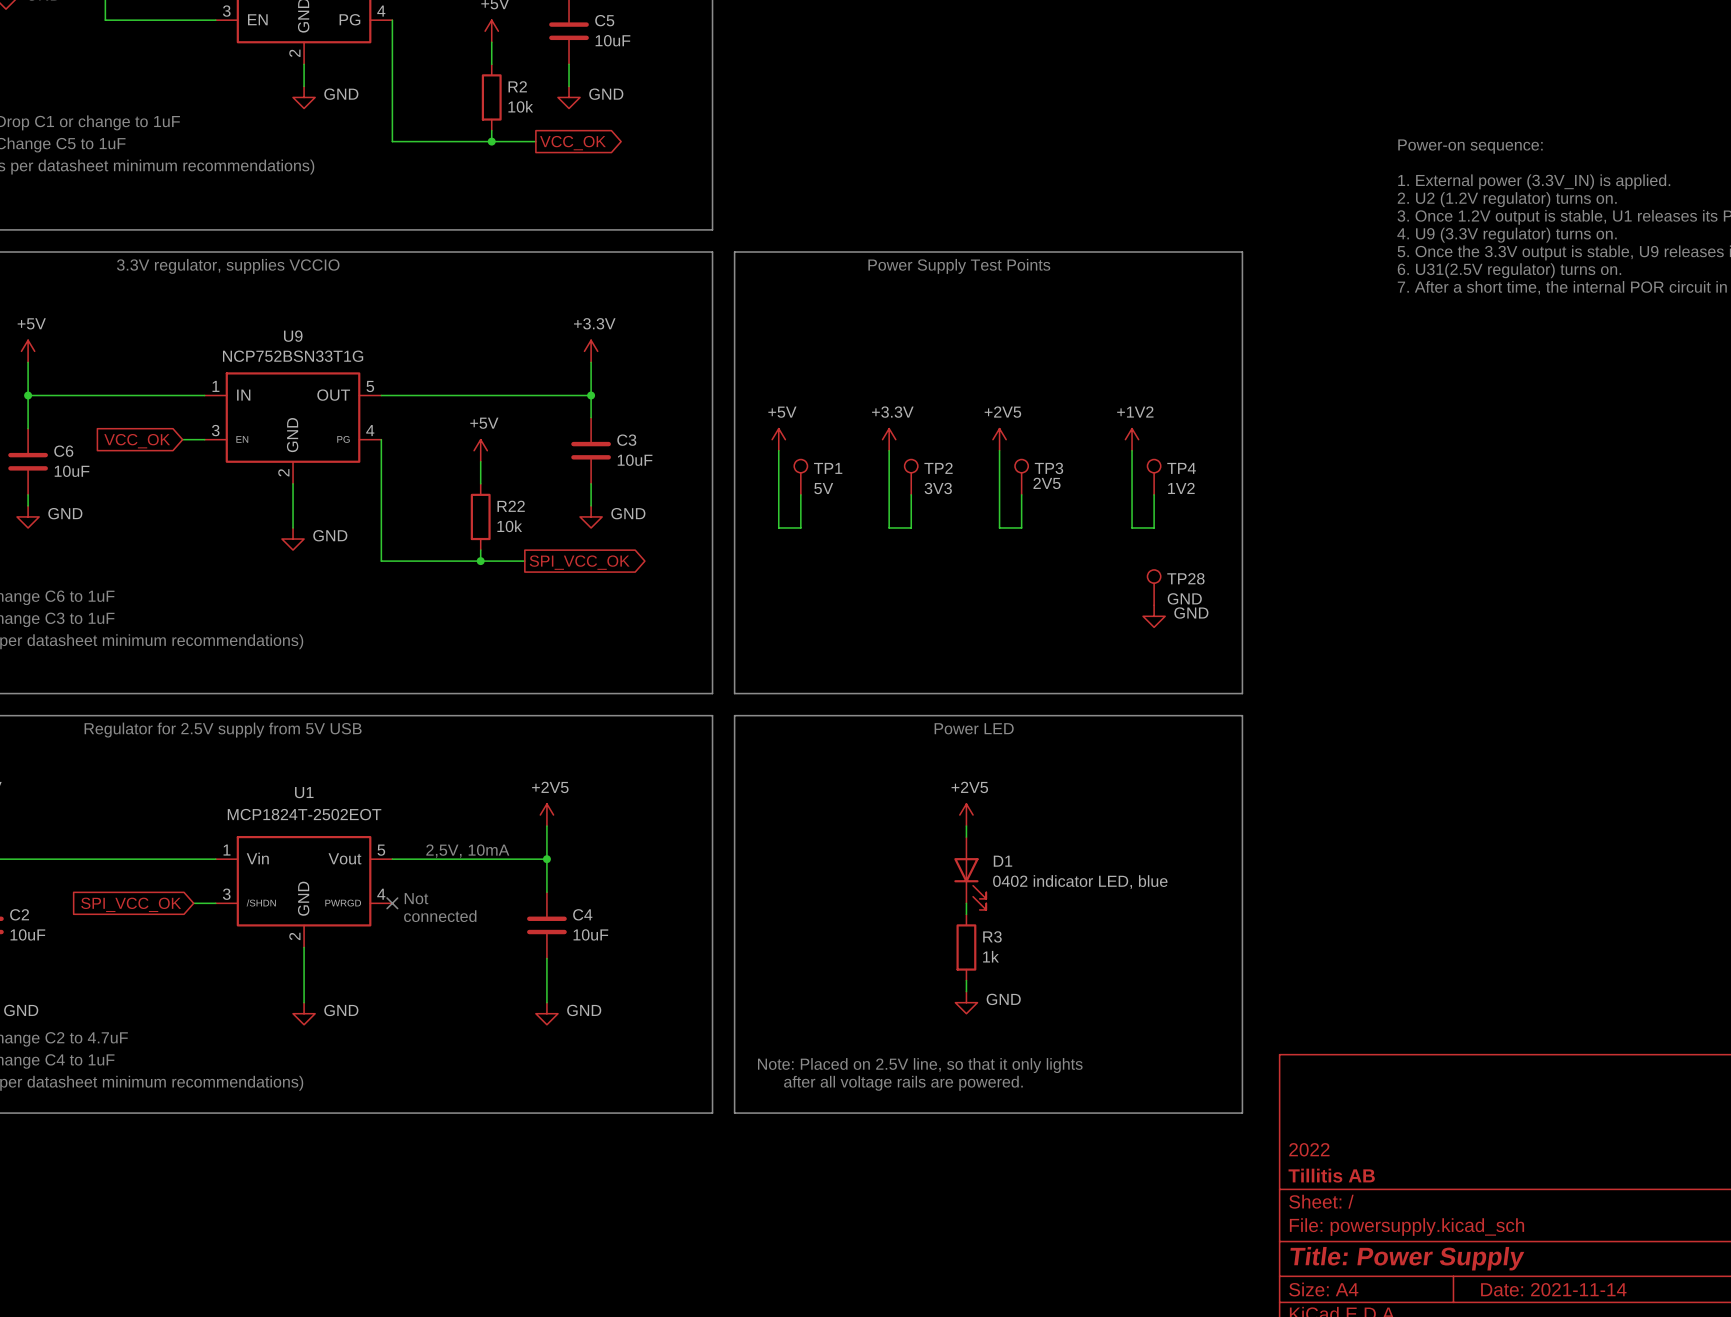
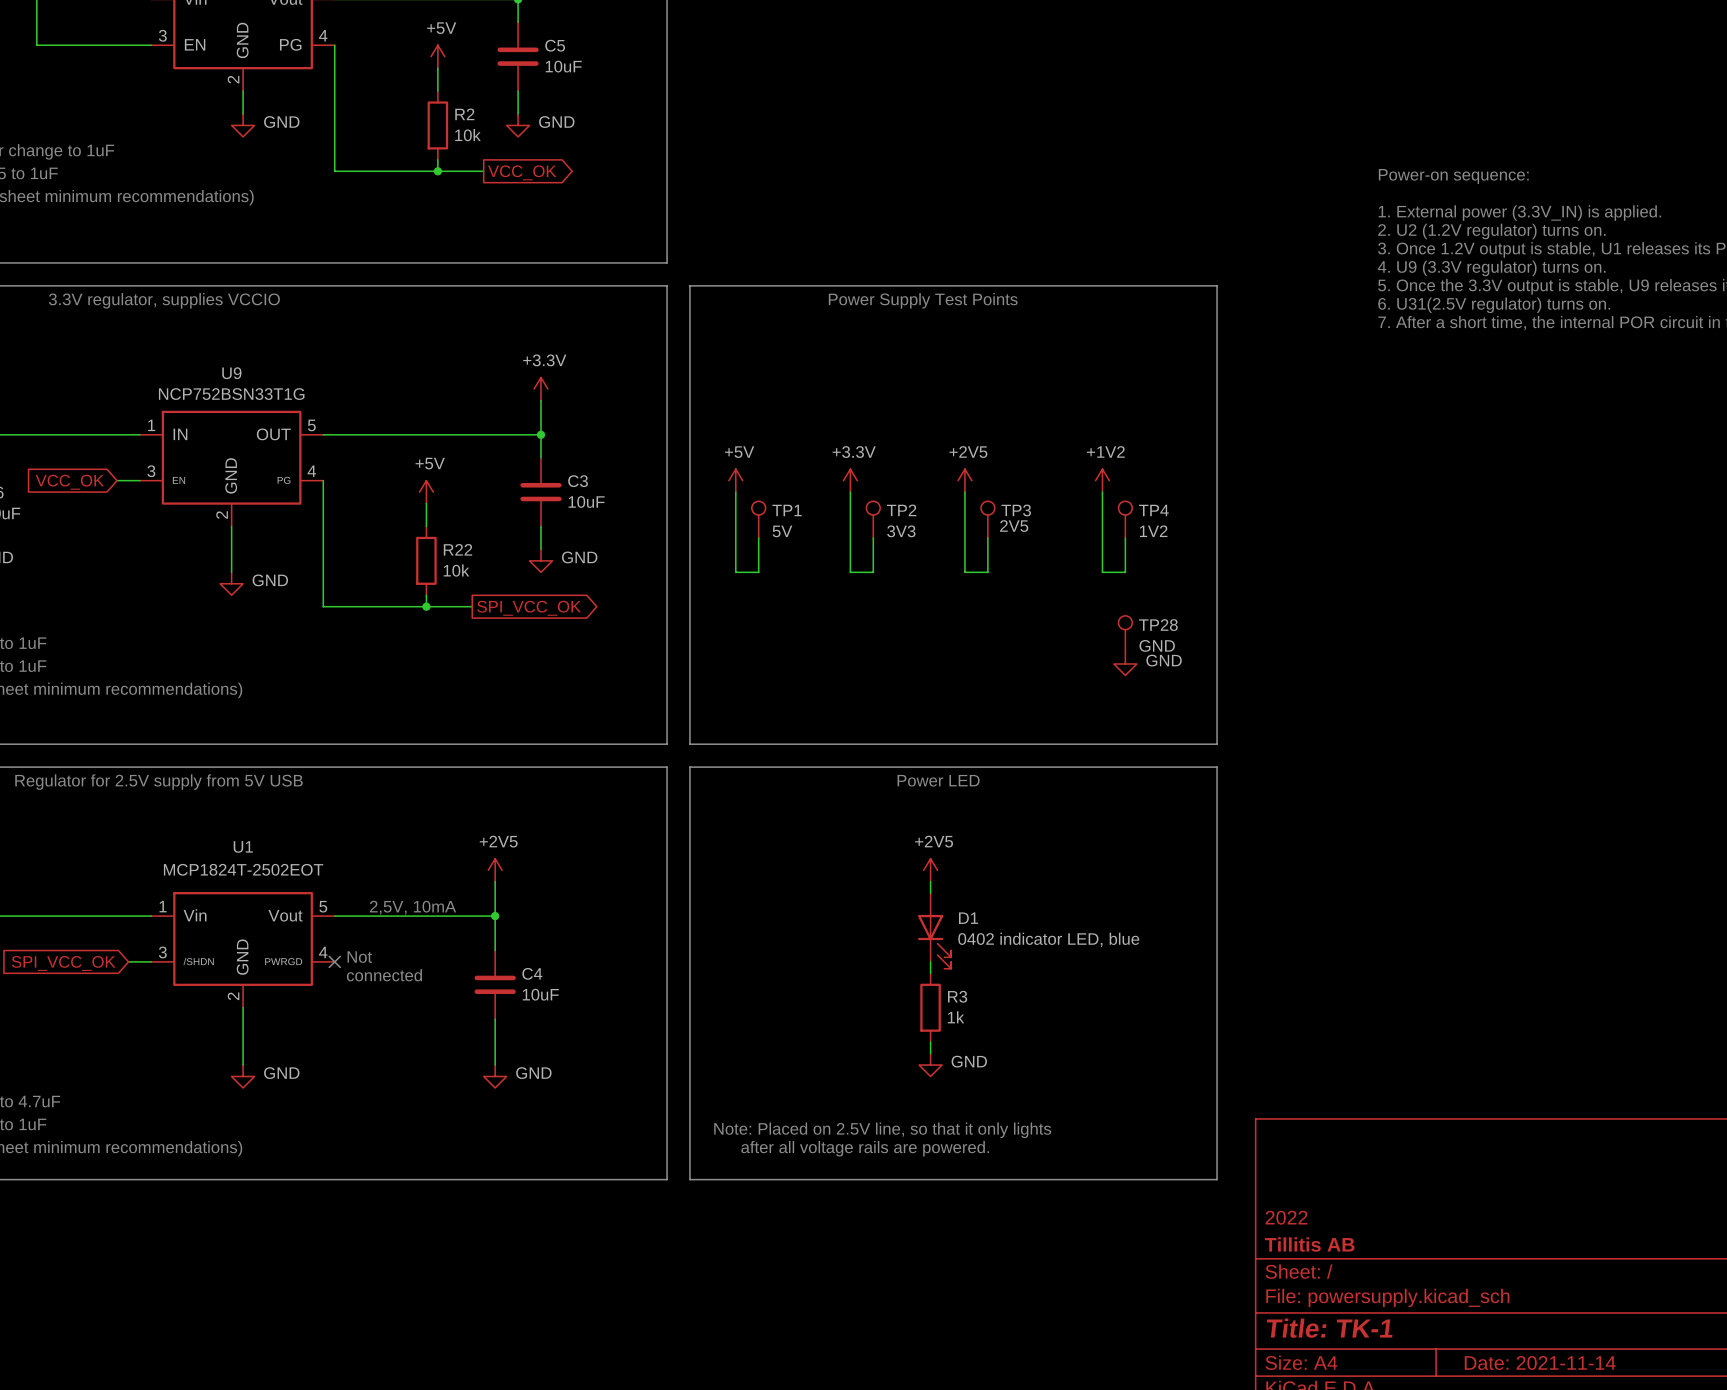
title block: Title: Power Supply (1407, 1258) -> Title: TK-1 (1329, 1328)

